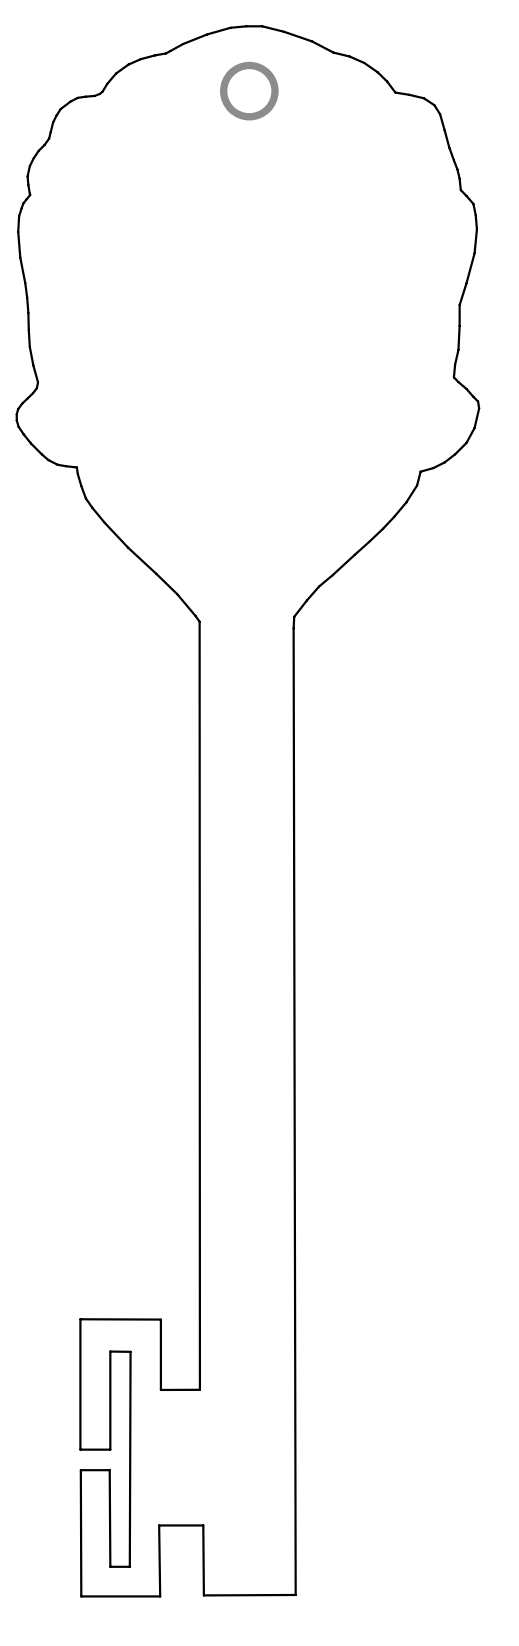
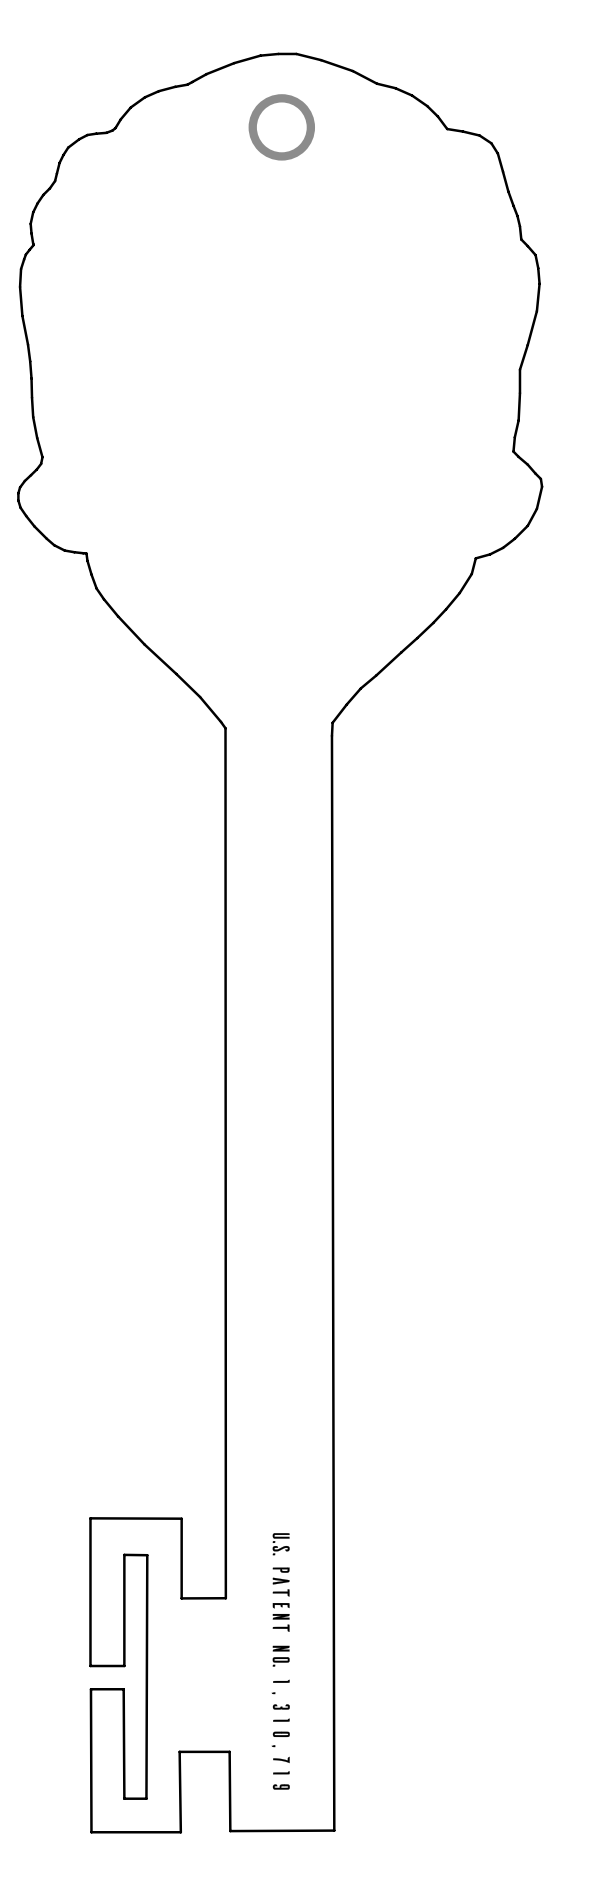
drawing: none -> [271, 1533, 290, 1790]

